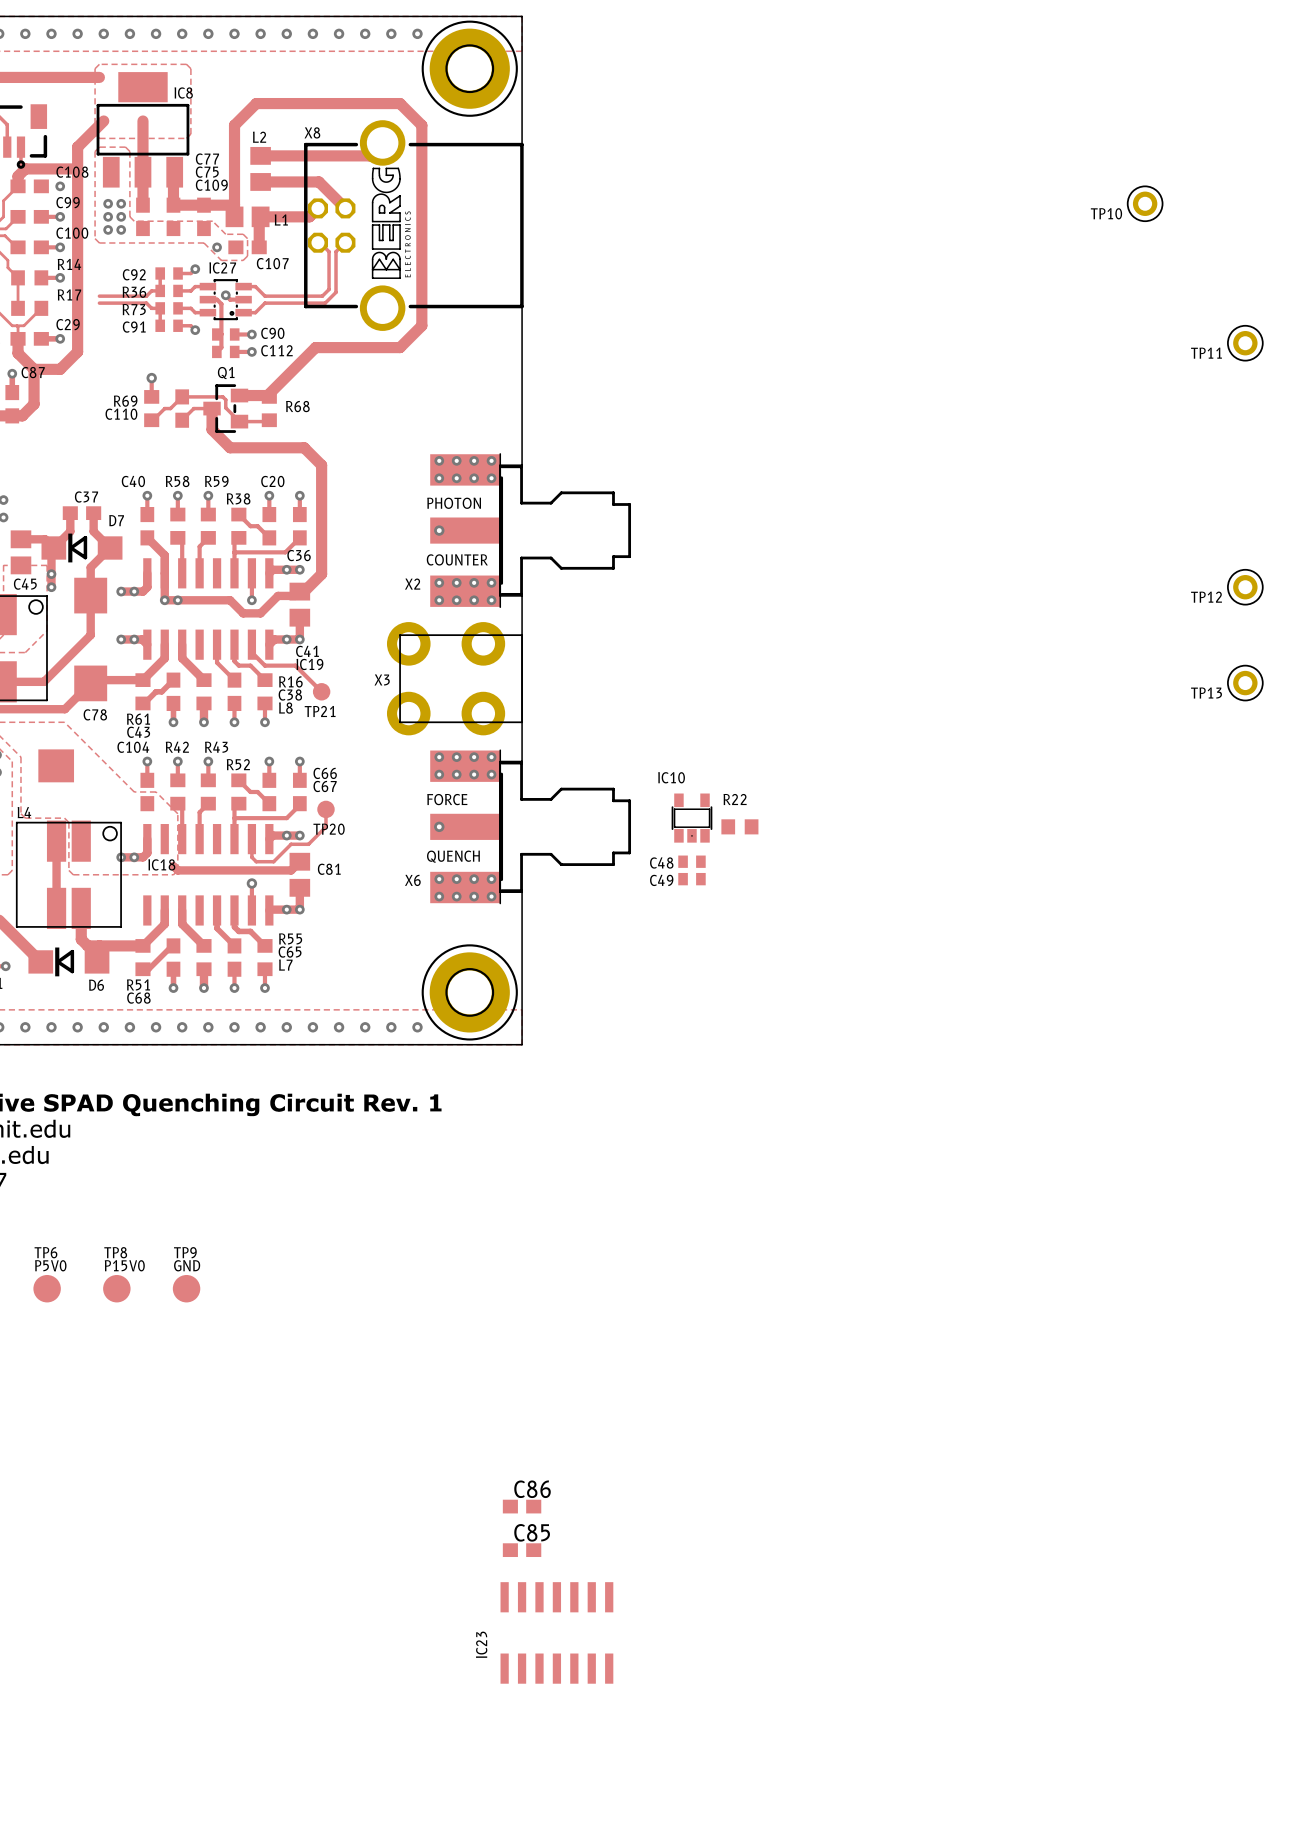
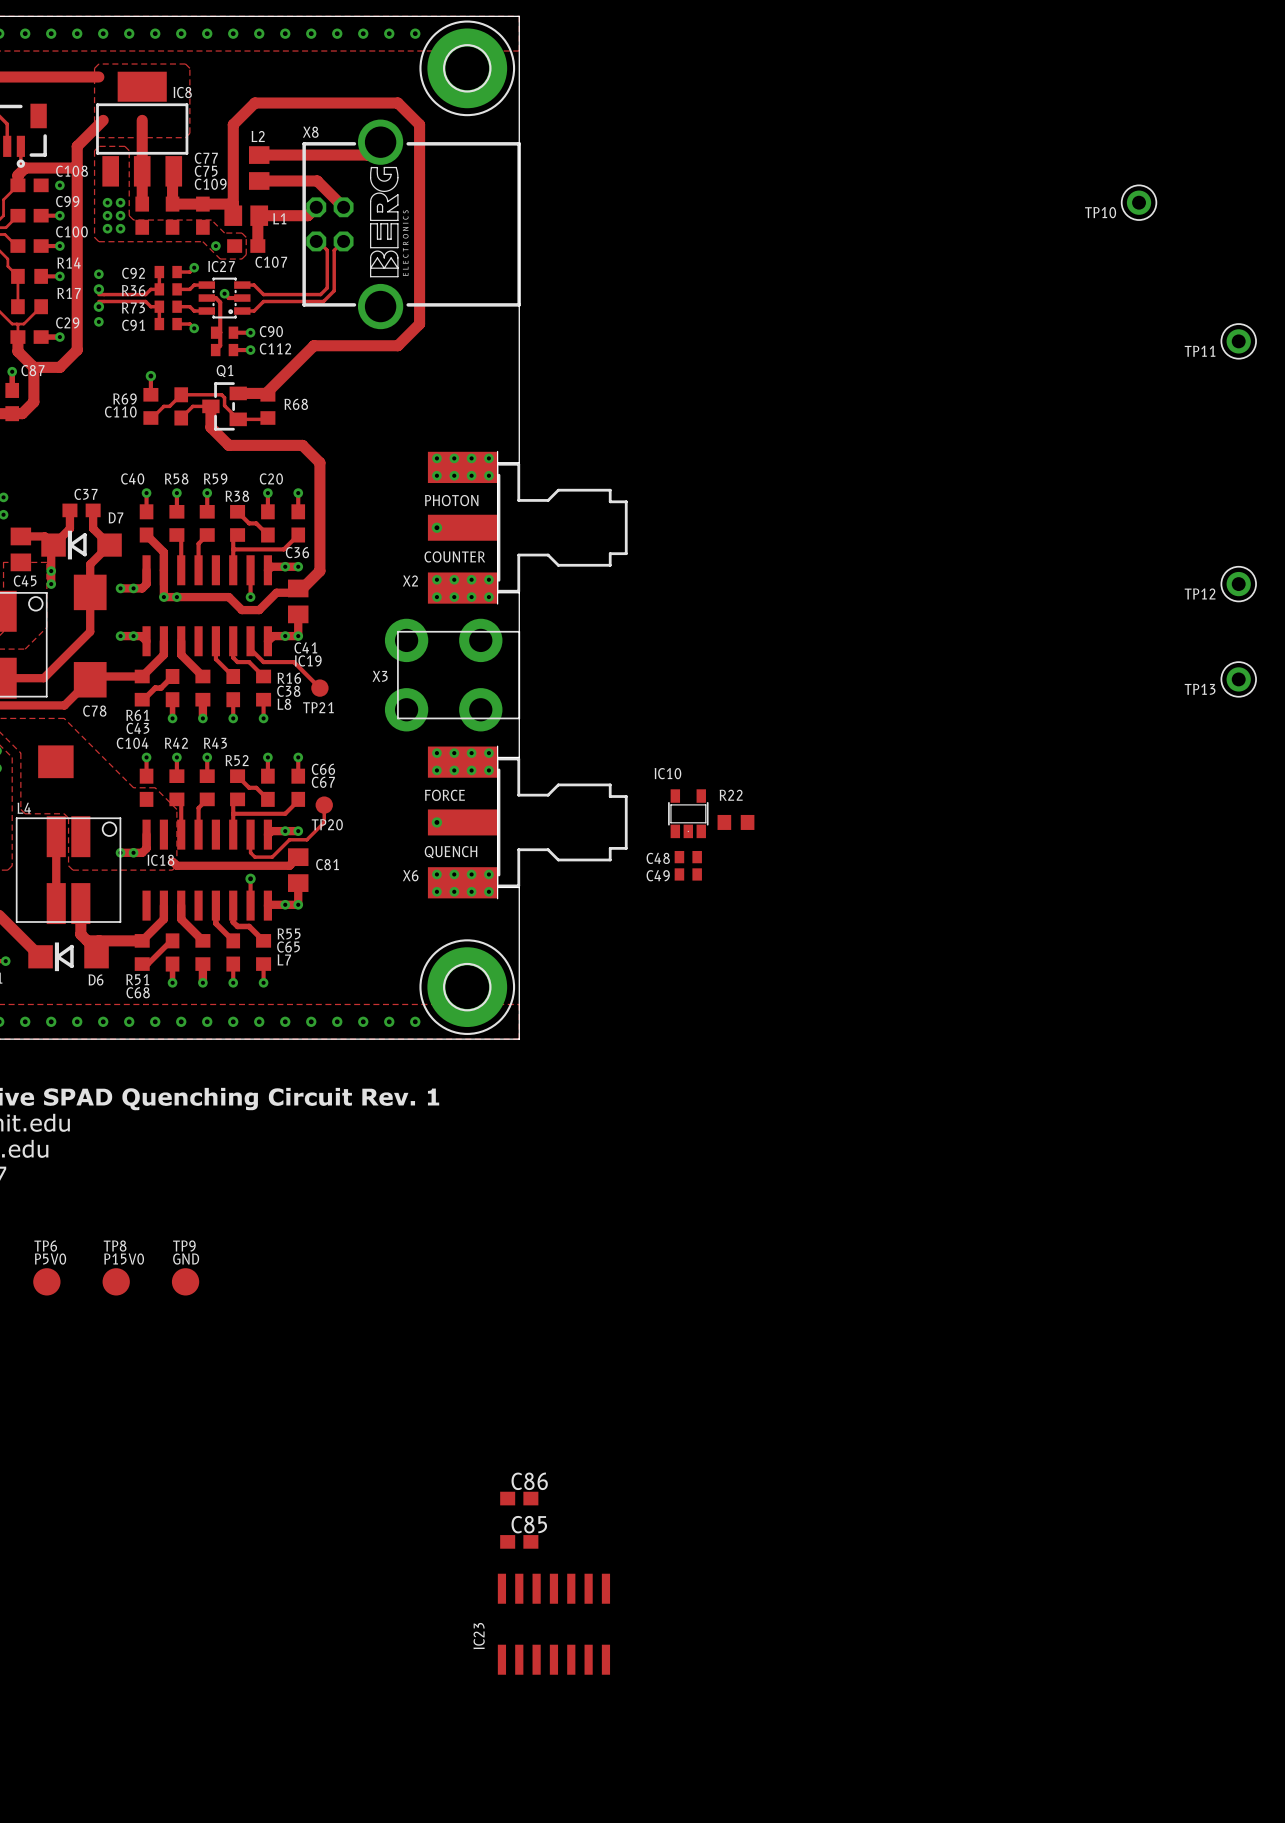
via: none -> (98, 274)
via: none -> (98, 289)
via: none -> (98, 306)
via: none -> (98, 321)

